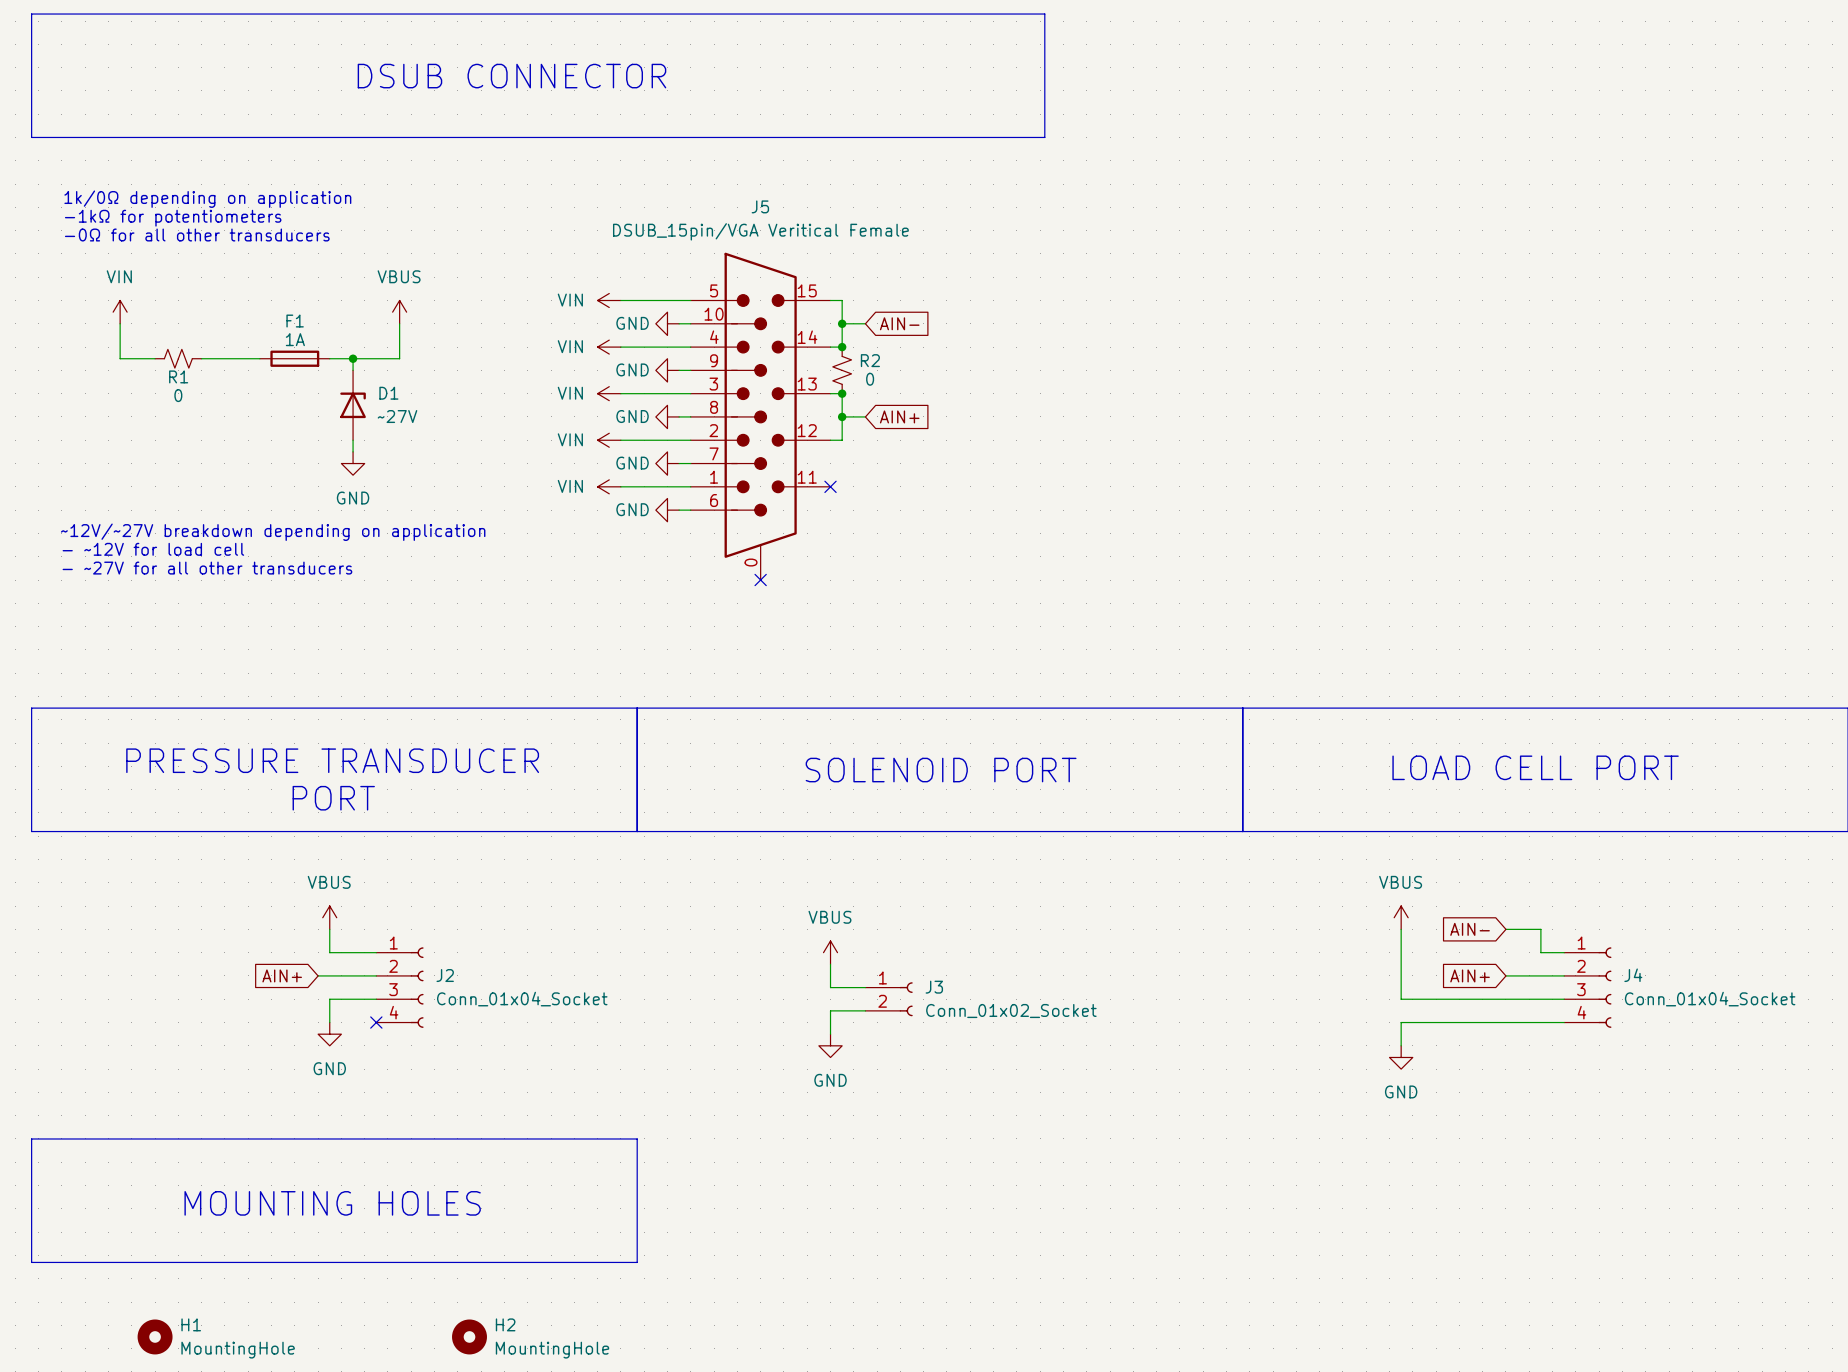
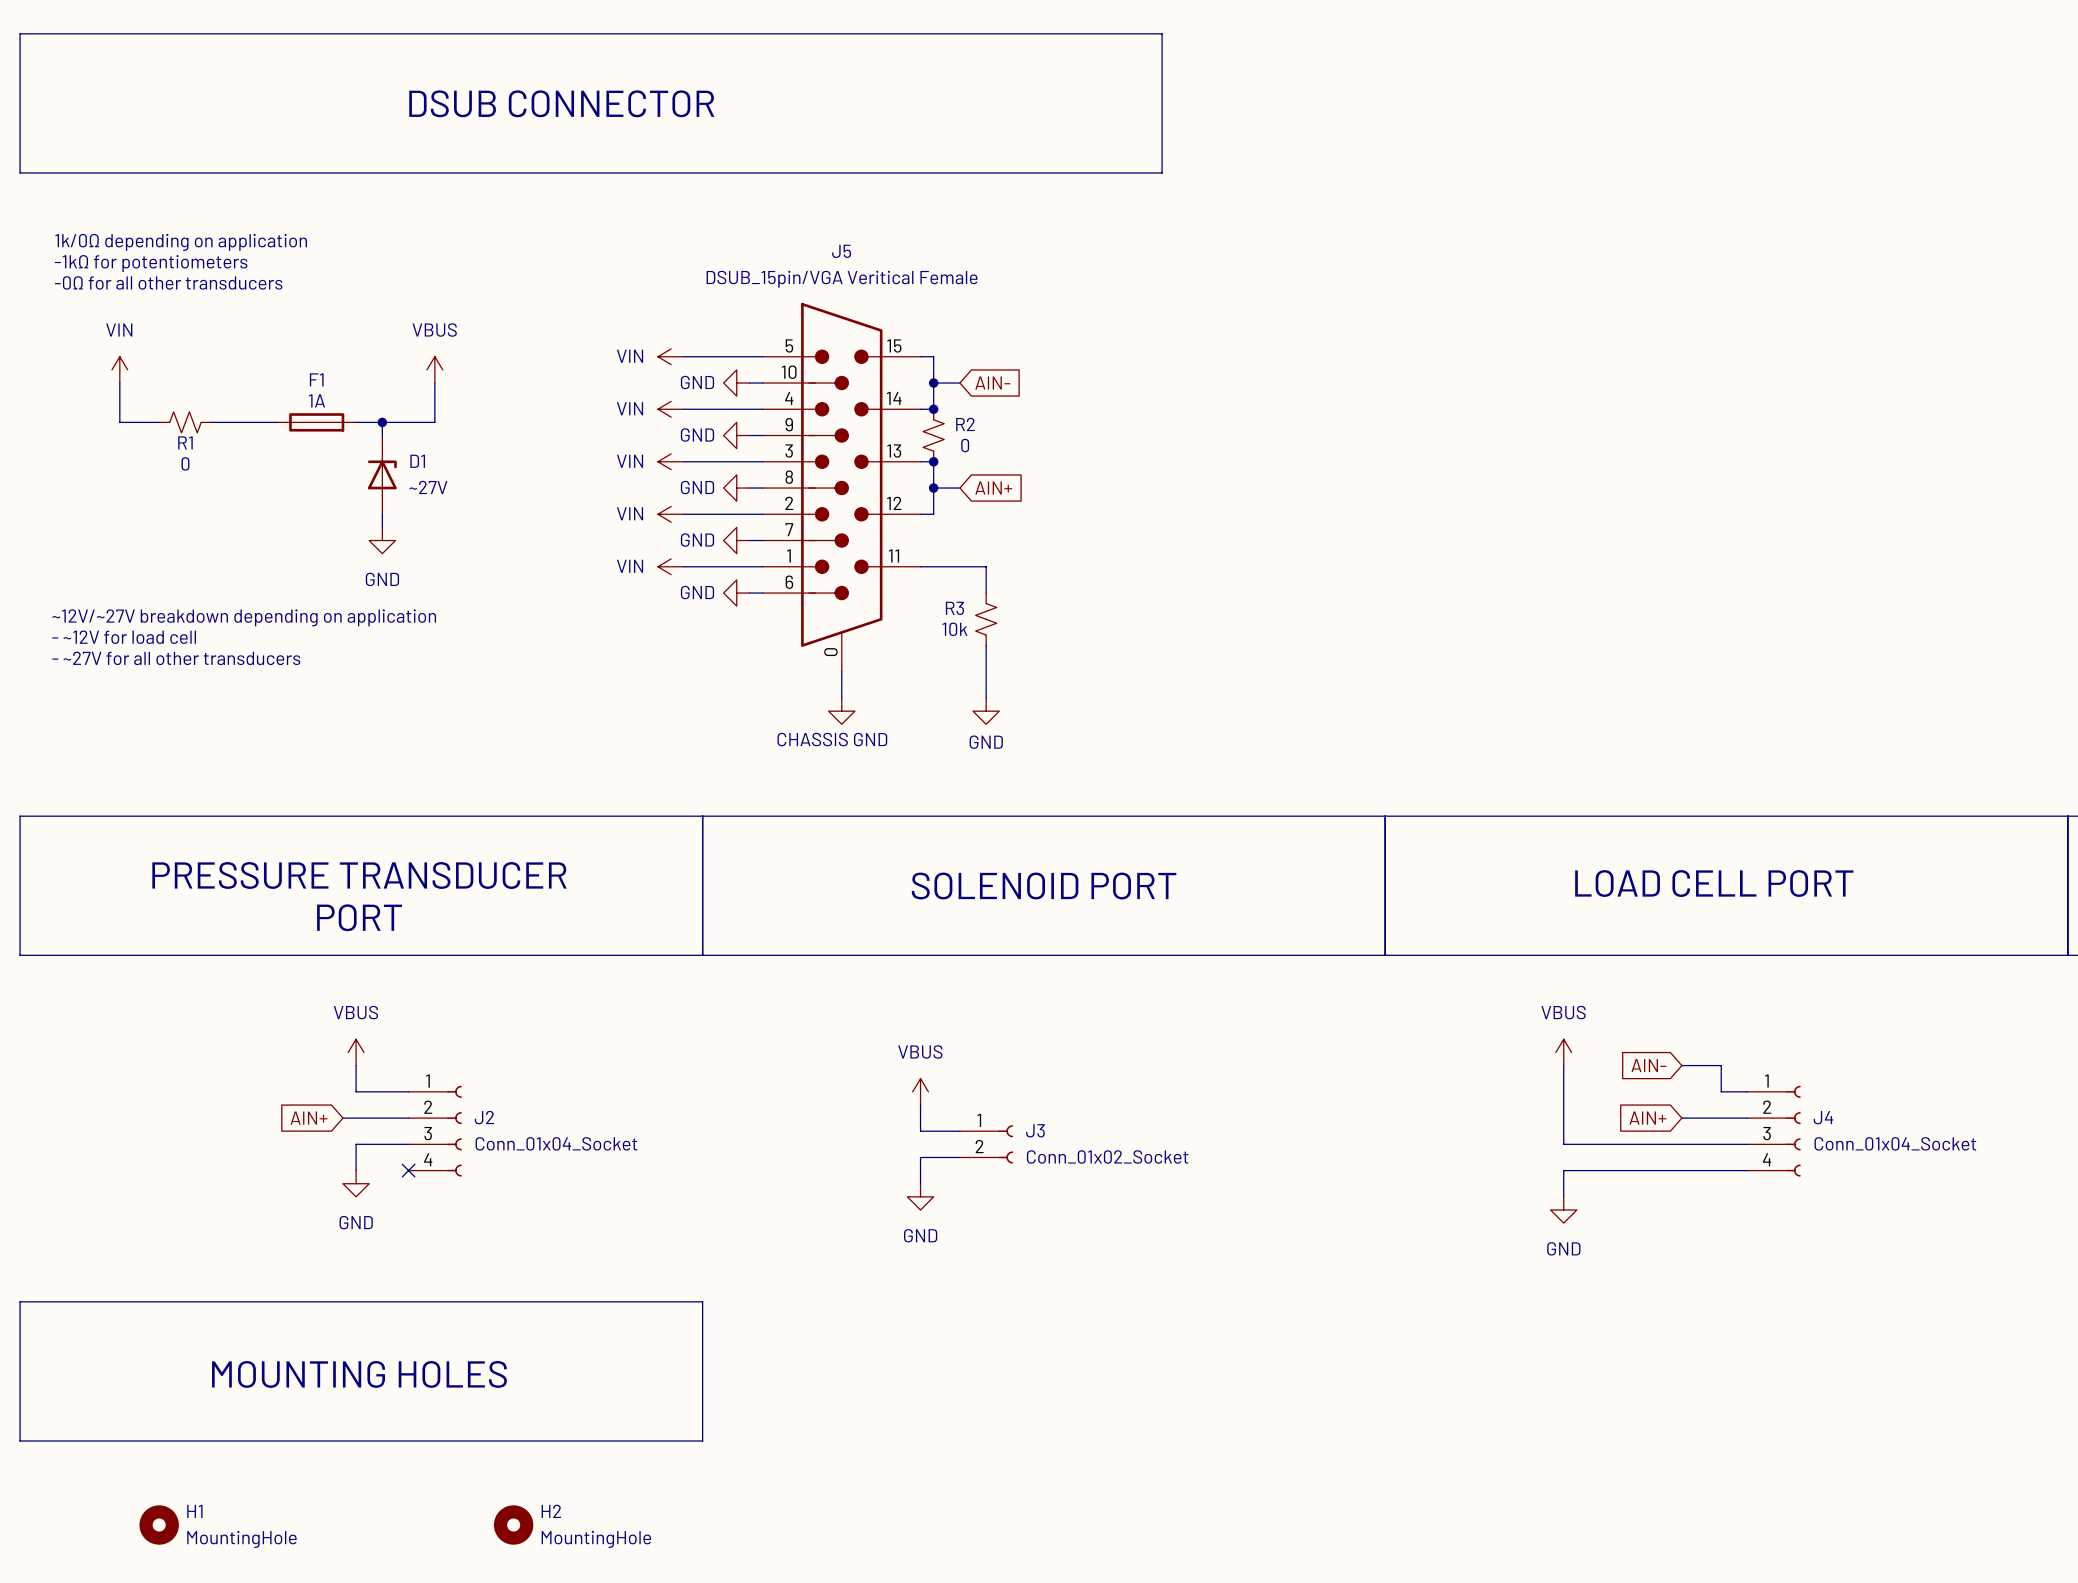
wire: none -> (920, 566) (986, 566) (986, 593)
no-connect mark: (830, 486) -> none
R3: none -> 10k (986, 619)
wire: none -> (986, 645) (986, 698)
wire: none -> (841, 671) (841, 698)
no-connect mark: (760, 580) -> none
power symbol: none -> CHASSIS GND (841, 711)
power symbol: none -> GND (986, 711)

